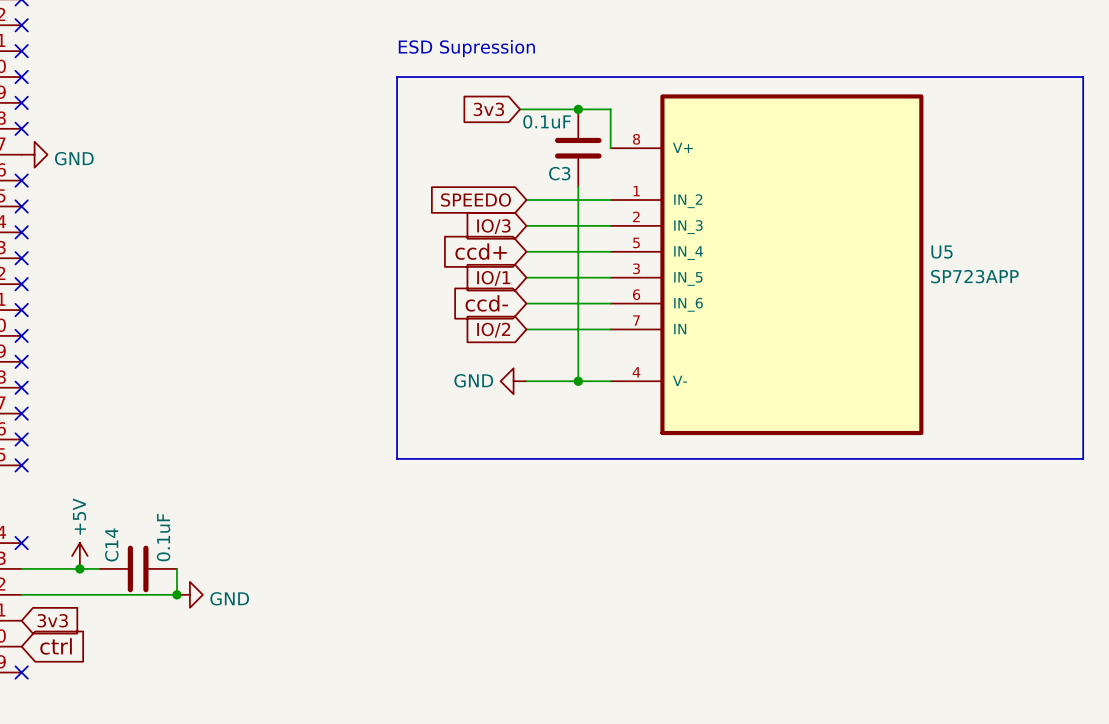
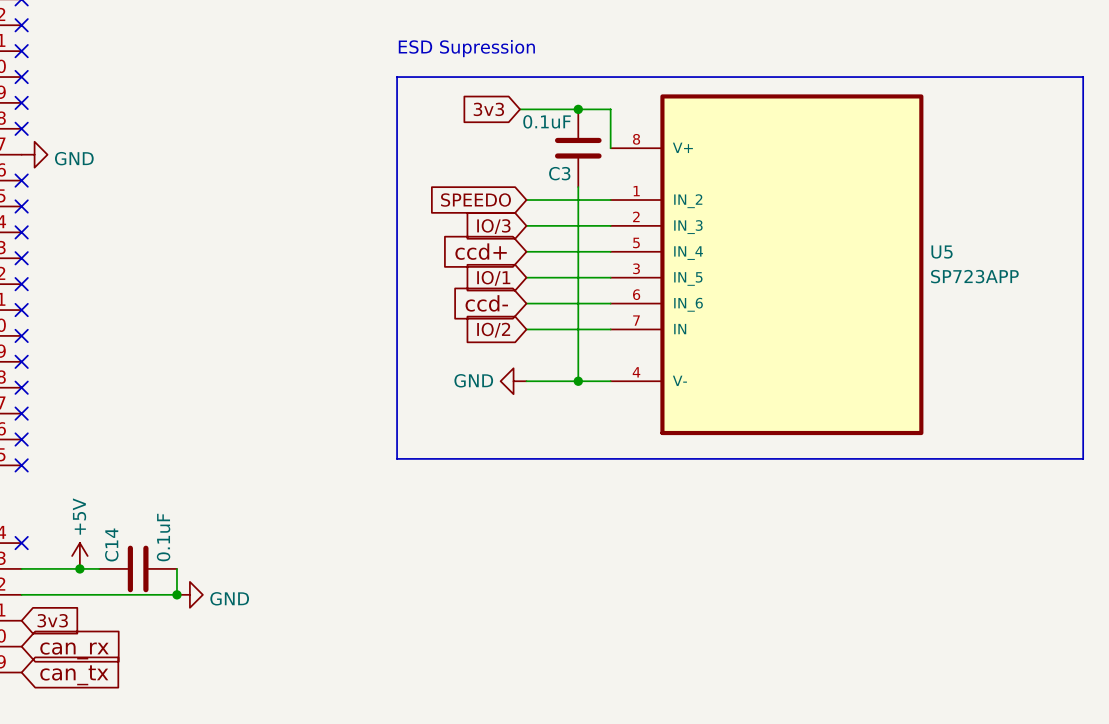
global label: ctrl (56, 646) -> can_rx (74, 650)
no-connect mark: (21, 672) -> none
global label: none -> can_tx (74, 675)

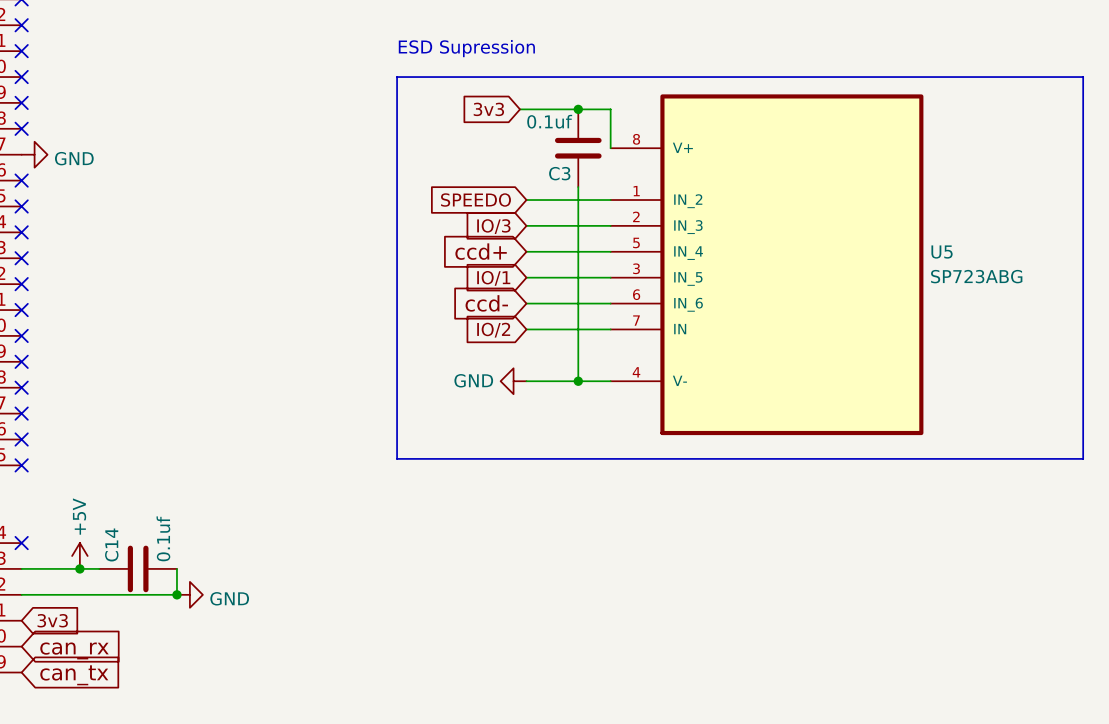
C3 value: 0.1uF (547, 121) -> 0.1uf (549, 121)
U5 value: SP723APP (974, 276) -> SP723ABG (976, 276)
C14 value: 0.1uF (163, 537) -> 0.1uf (163, 538)

